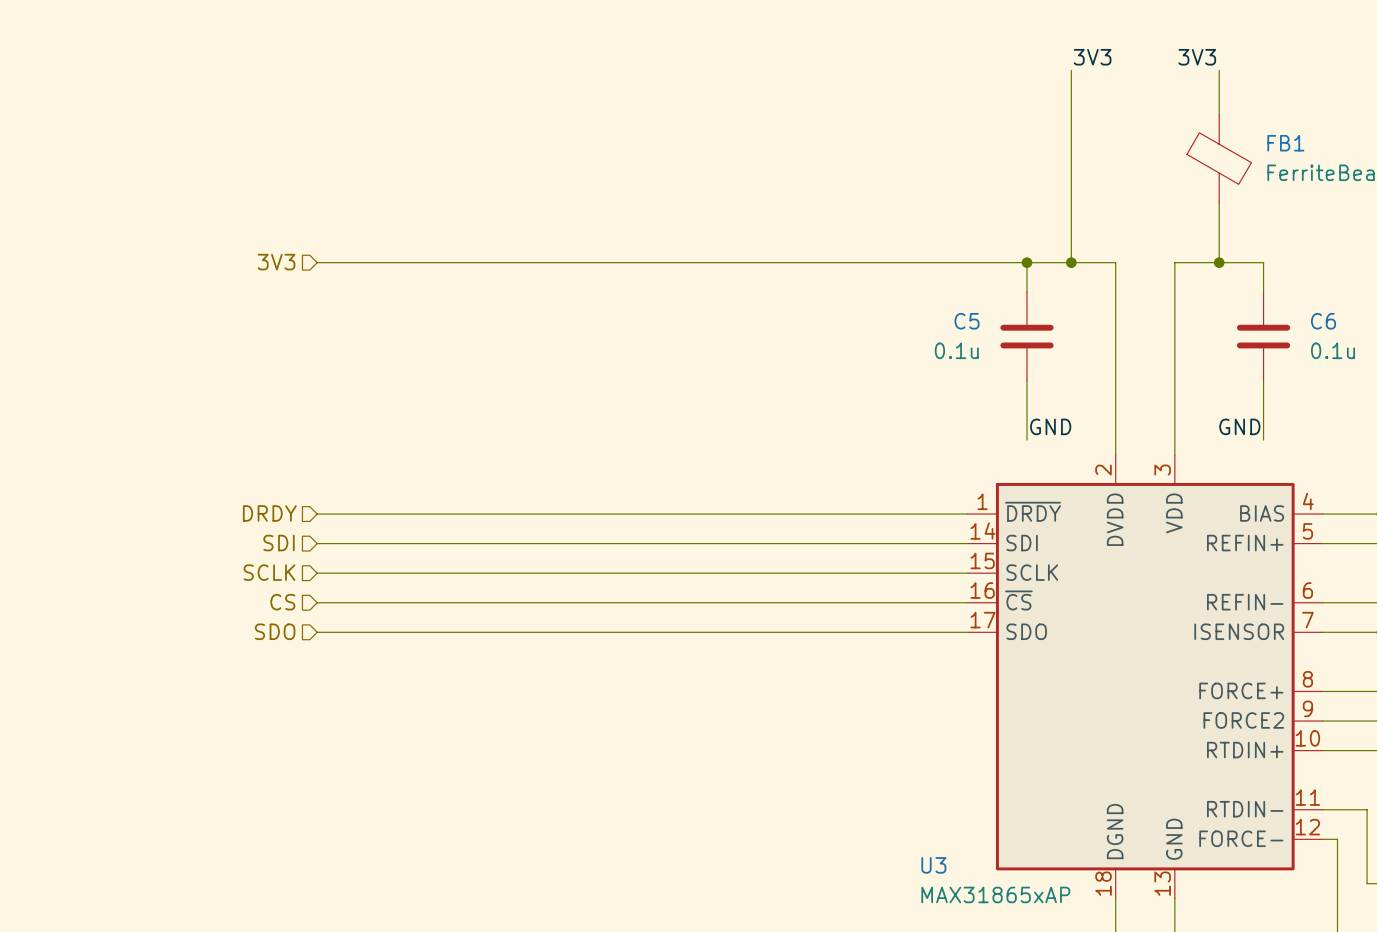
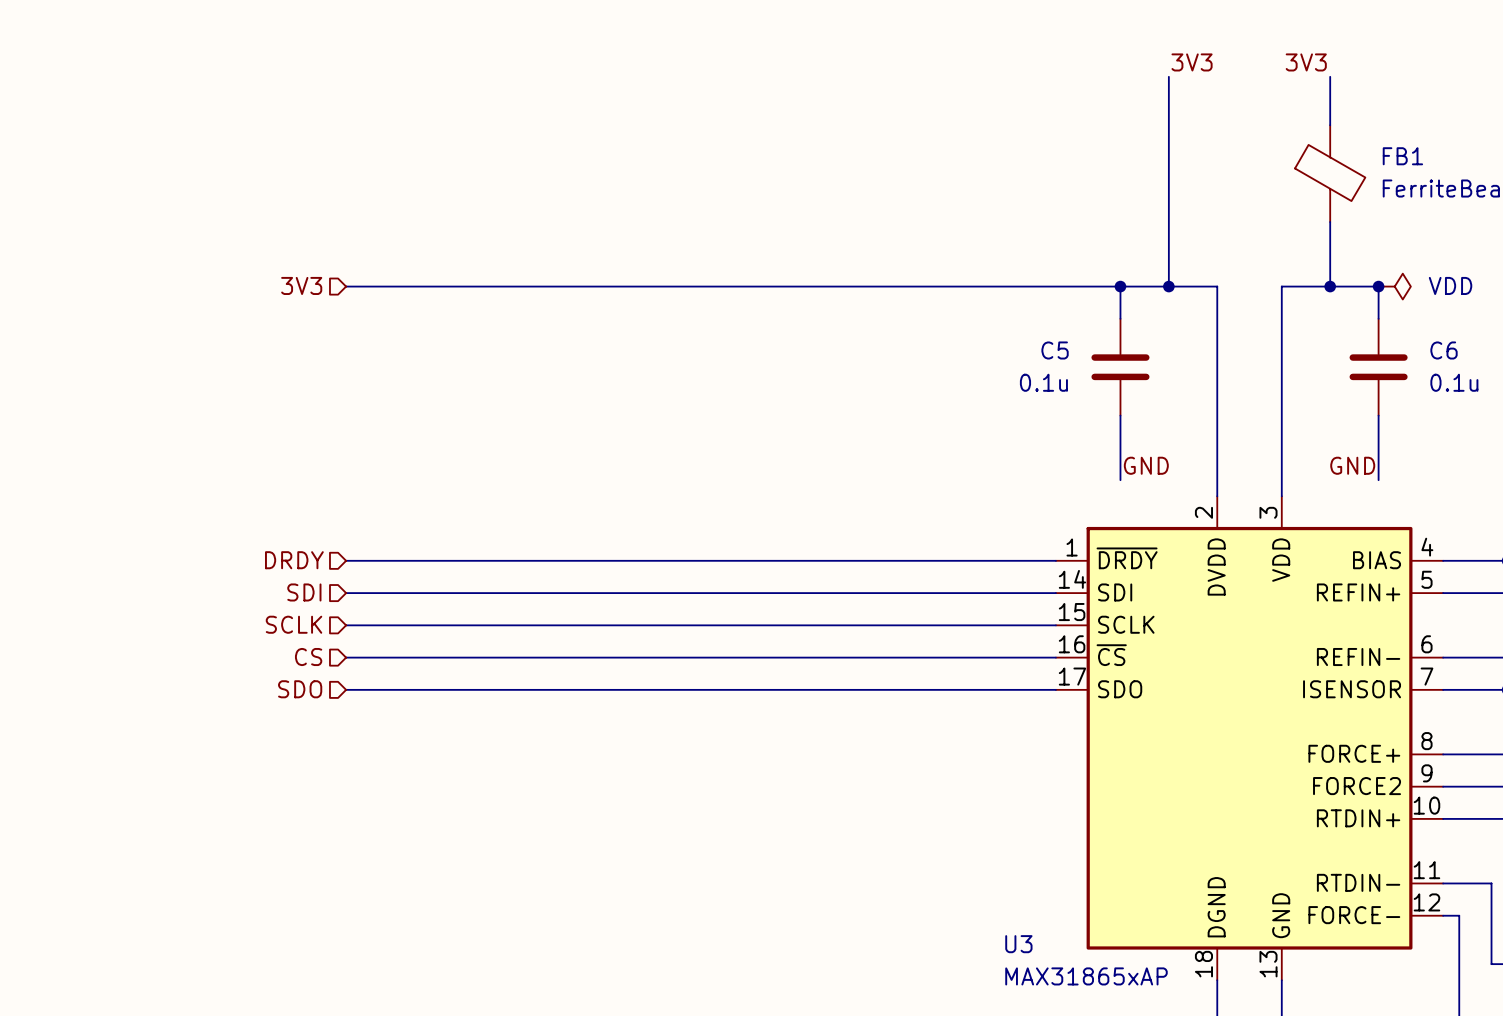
junction: none -> (1378, 286)
power symbol: none -> VDD (1394, 286)

